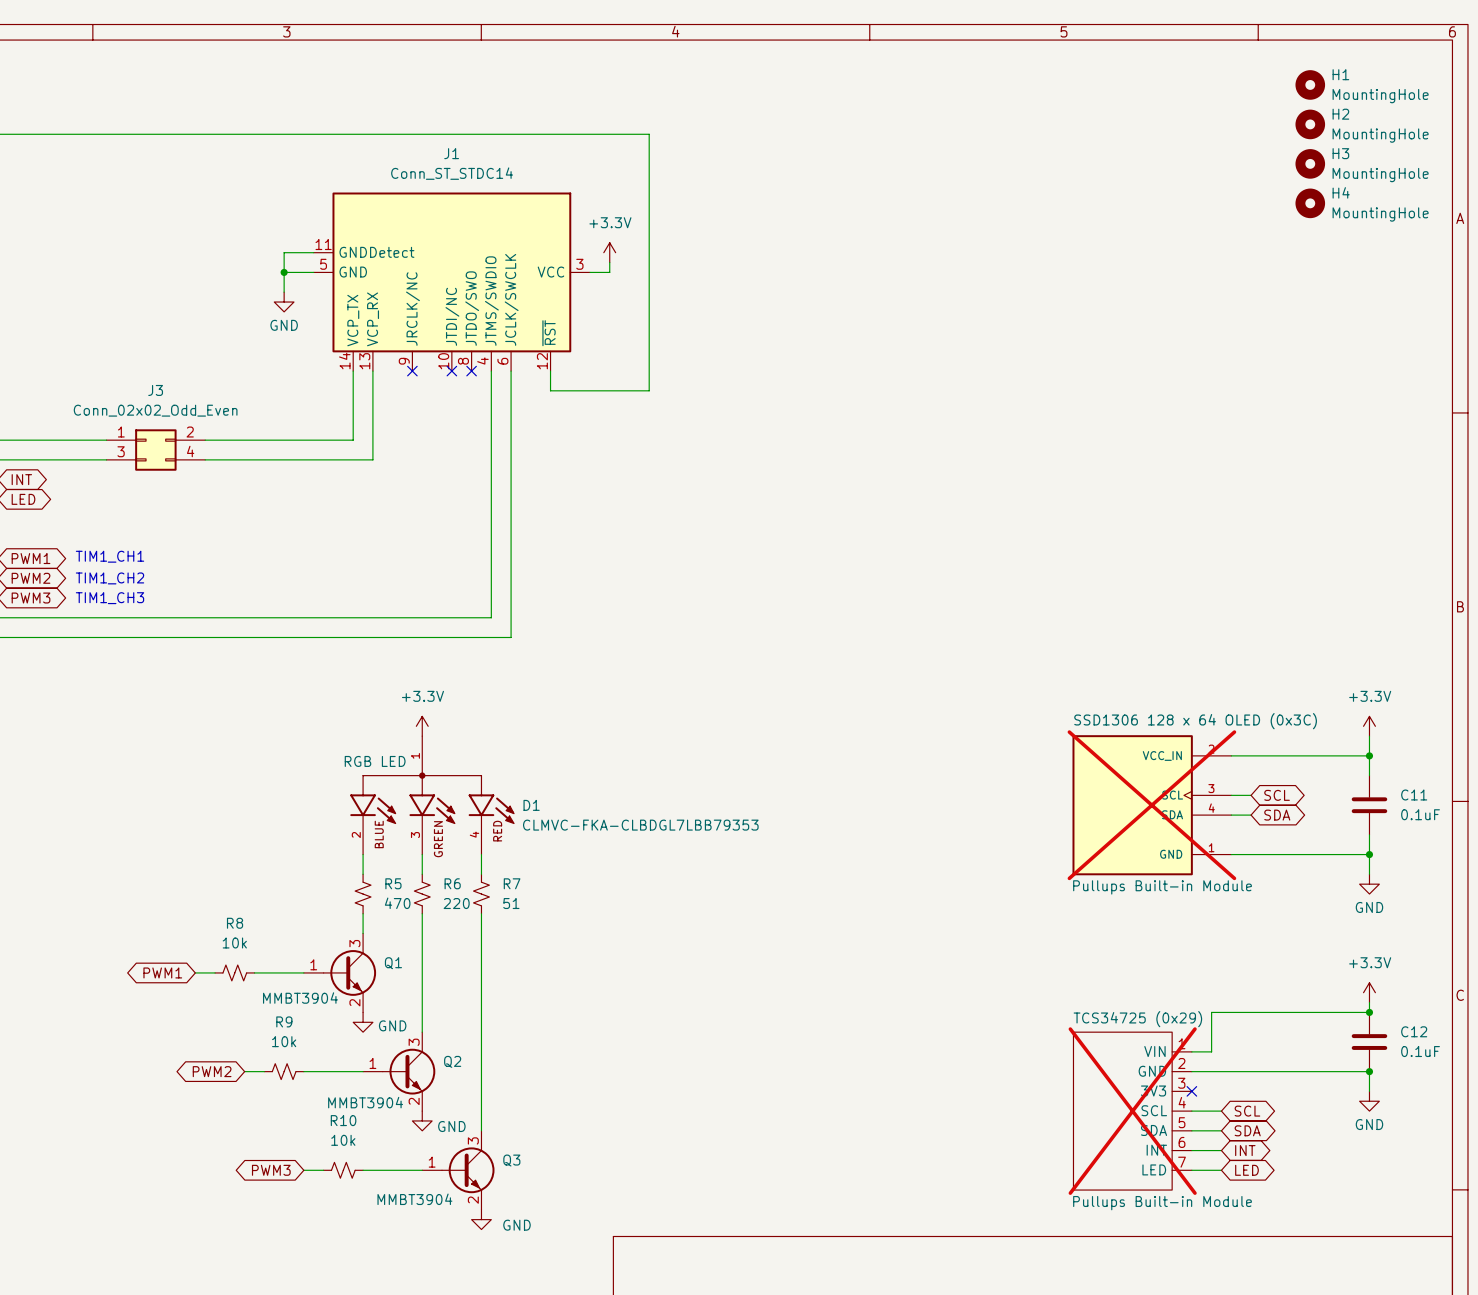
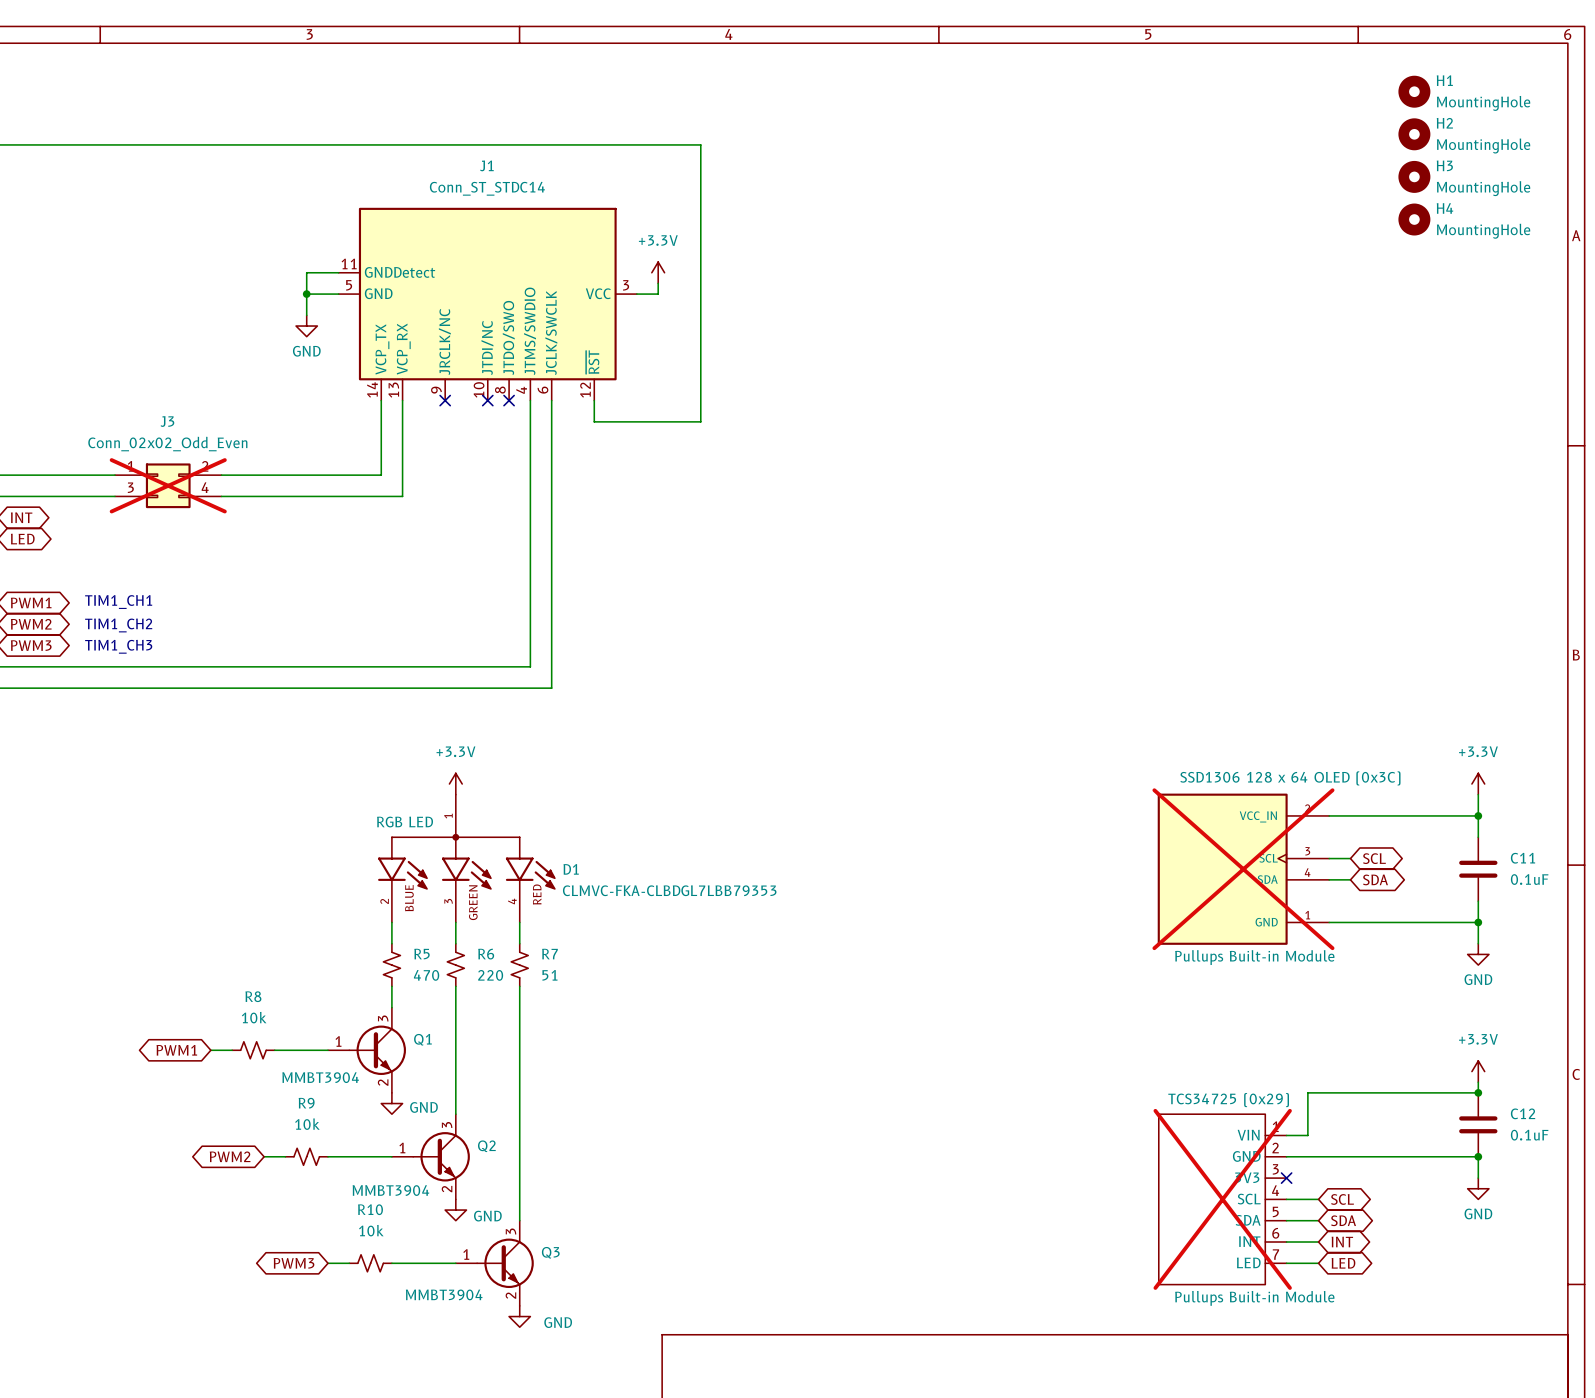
J3 do-not-place cross: none -> (168, 485)

